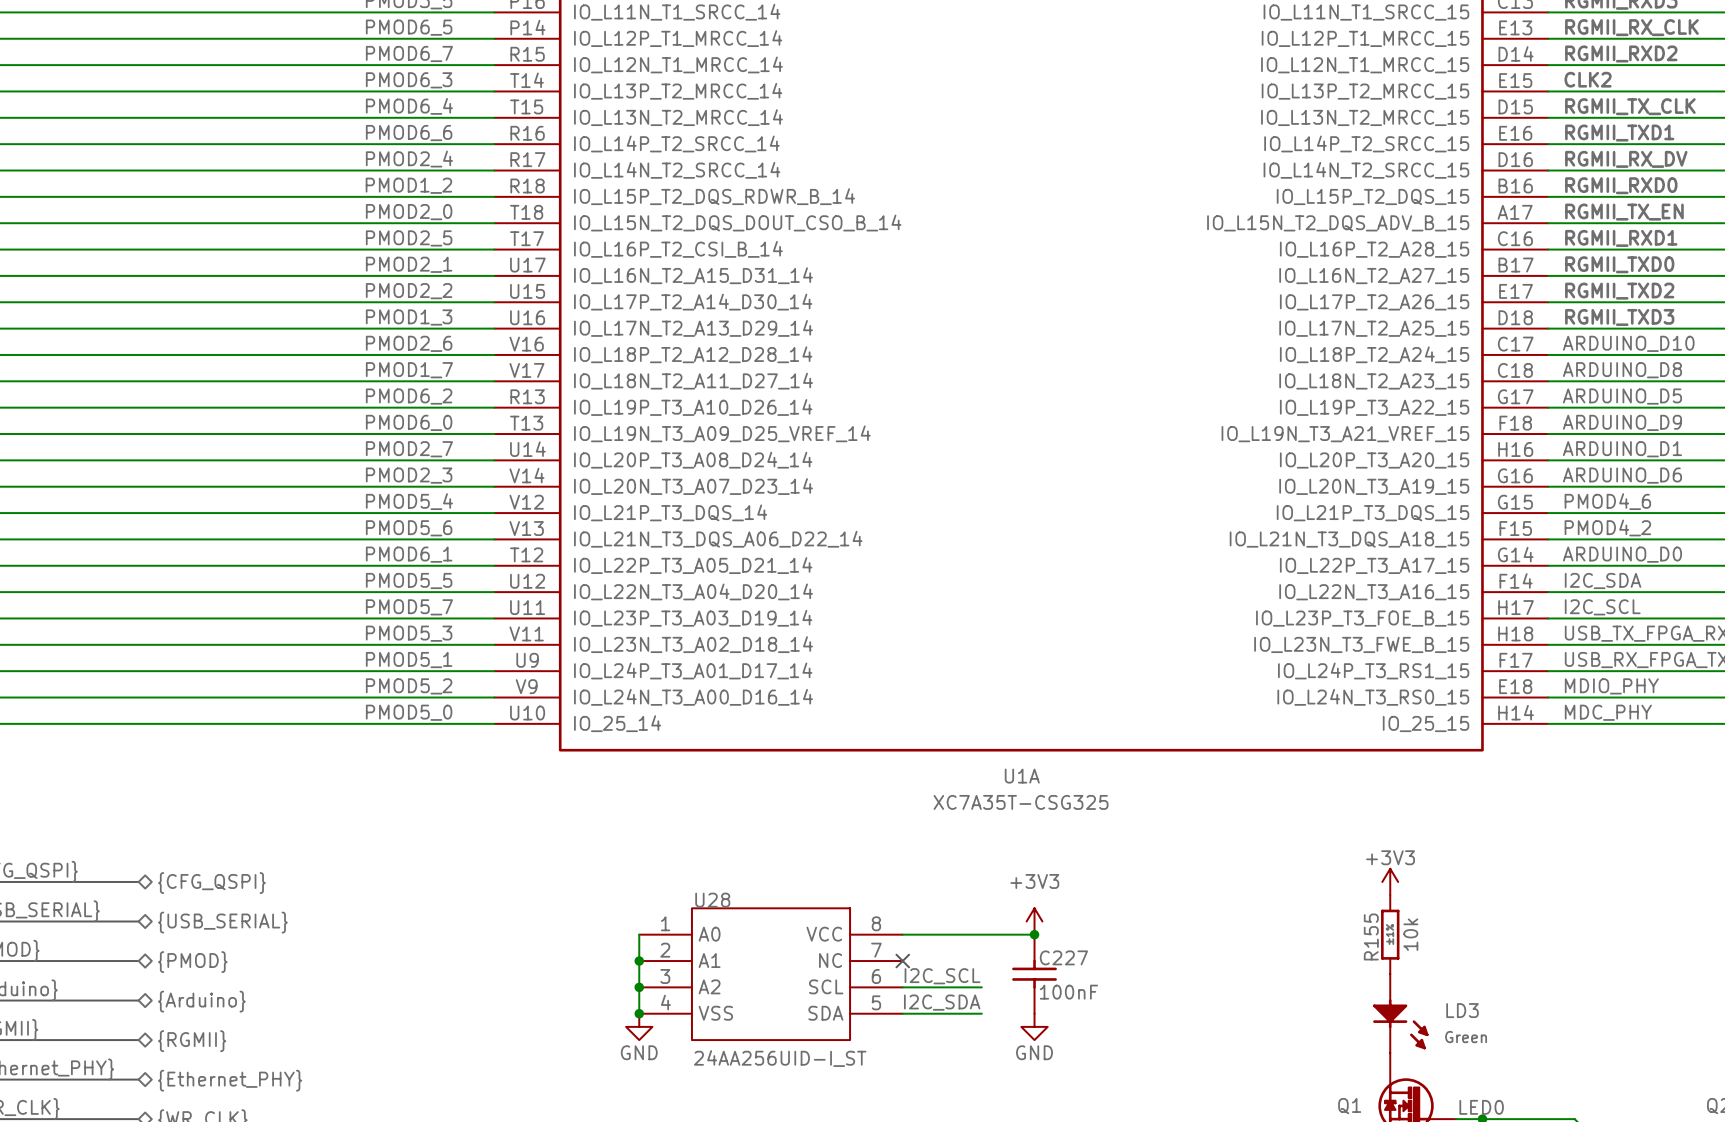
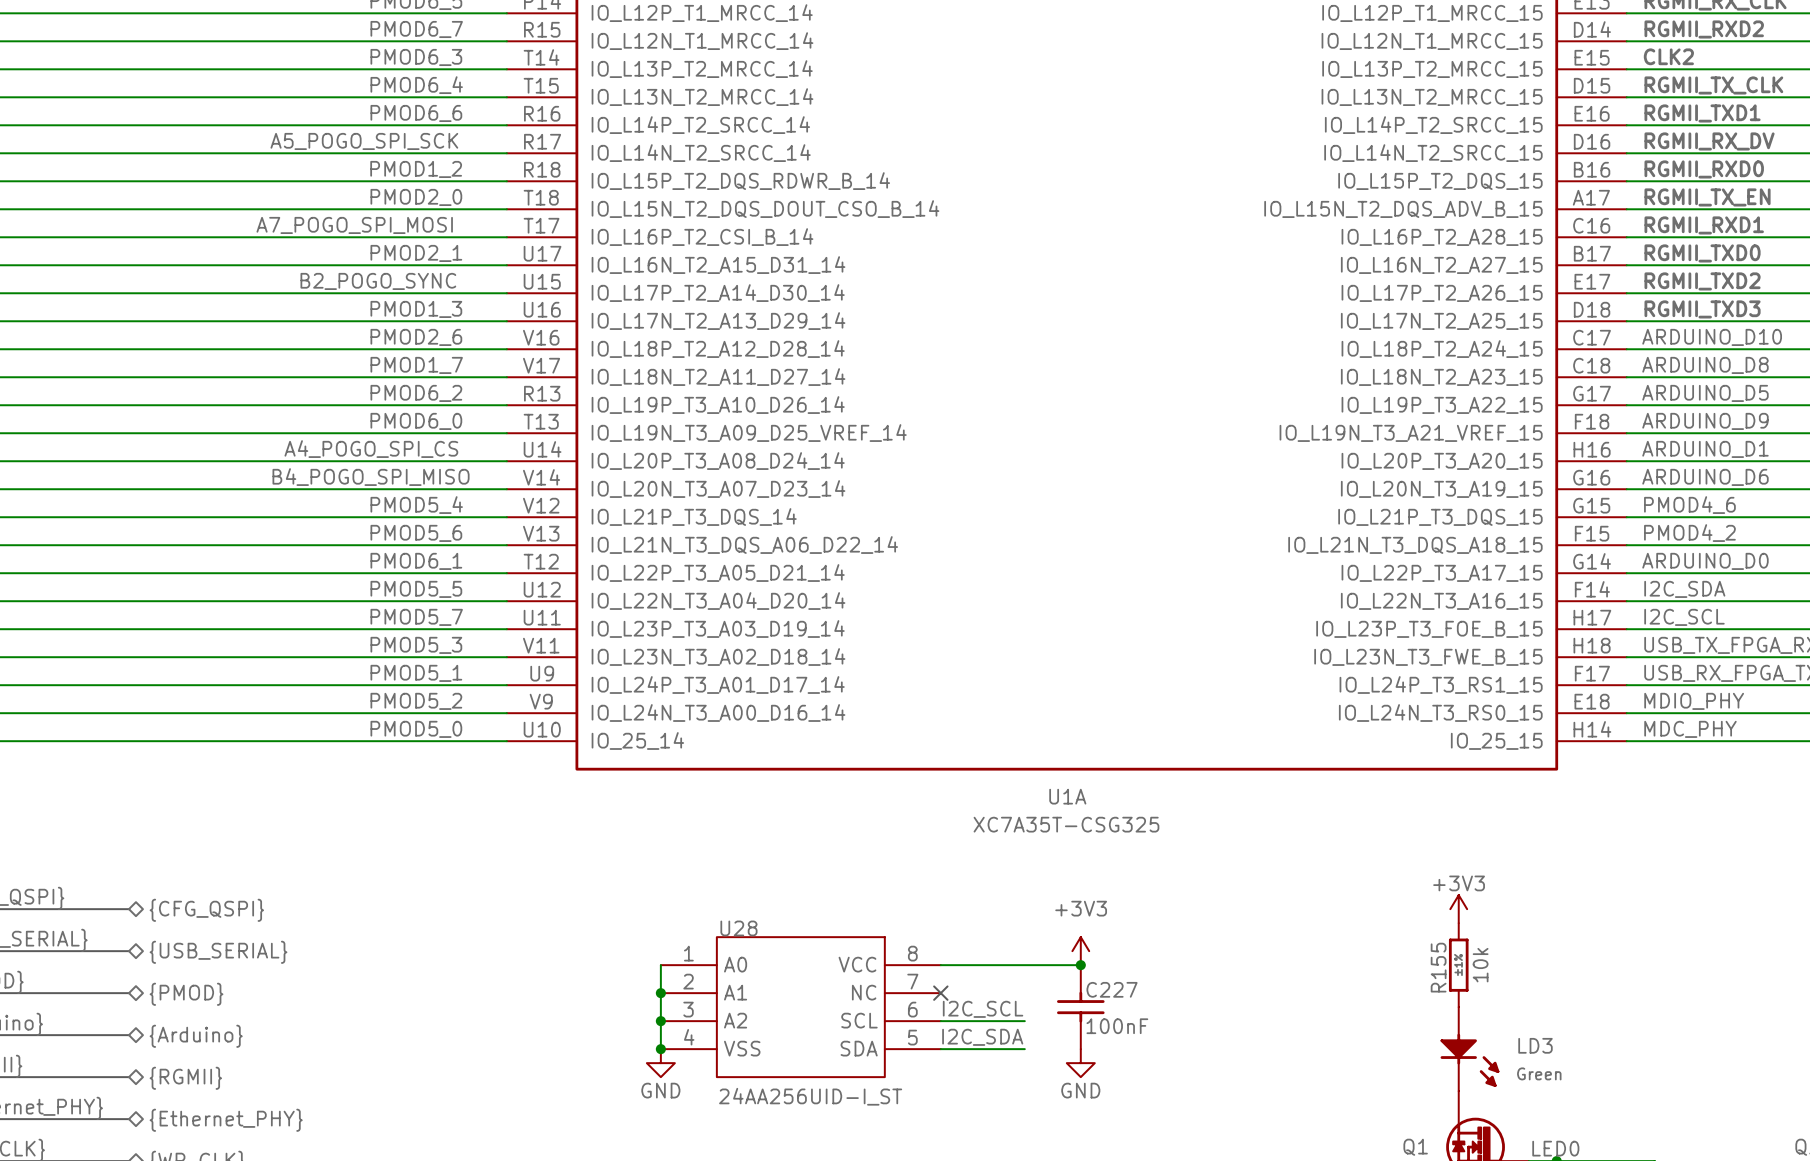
label: none -> A5_POGO_SPI_SCK (364, 141)
label: PMOD2_4 (409, 159) -> none
label: none -> A7_POGO_SPI_MOSI (354, 225)
label: PMOD2_5 (409, 238) -> none
label: none -> B2_POGO_SYNC (378, 281)
label: PMOD2_2 (409, 291) -> none
label: none -> A4_POGO_SPI_CS (371, 449)
label: PMOD2_7 (409, 449) -> none
label: none -> B4_POGO_SPI_MISO (371, 477)
label: PMOD2_3 (409, 475) -> none

